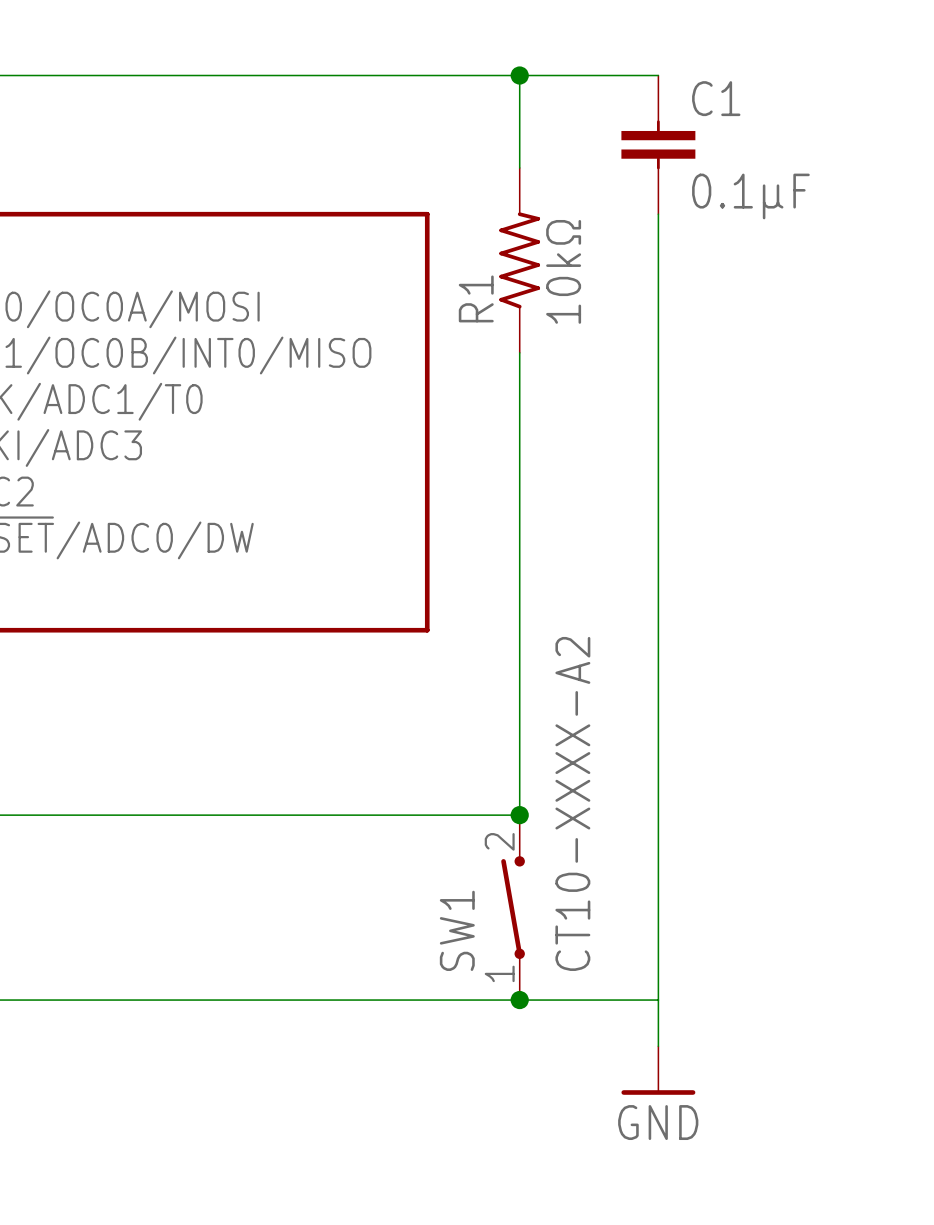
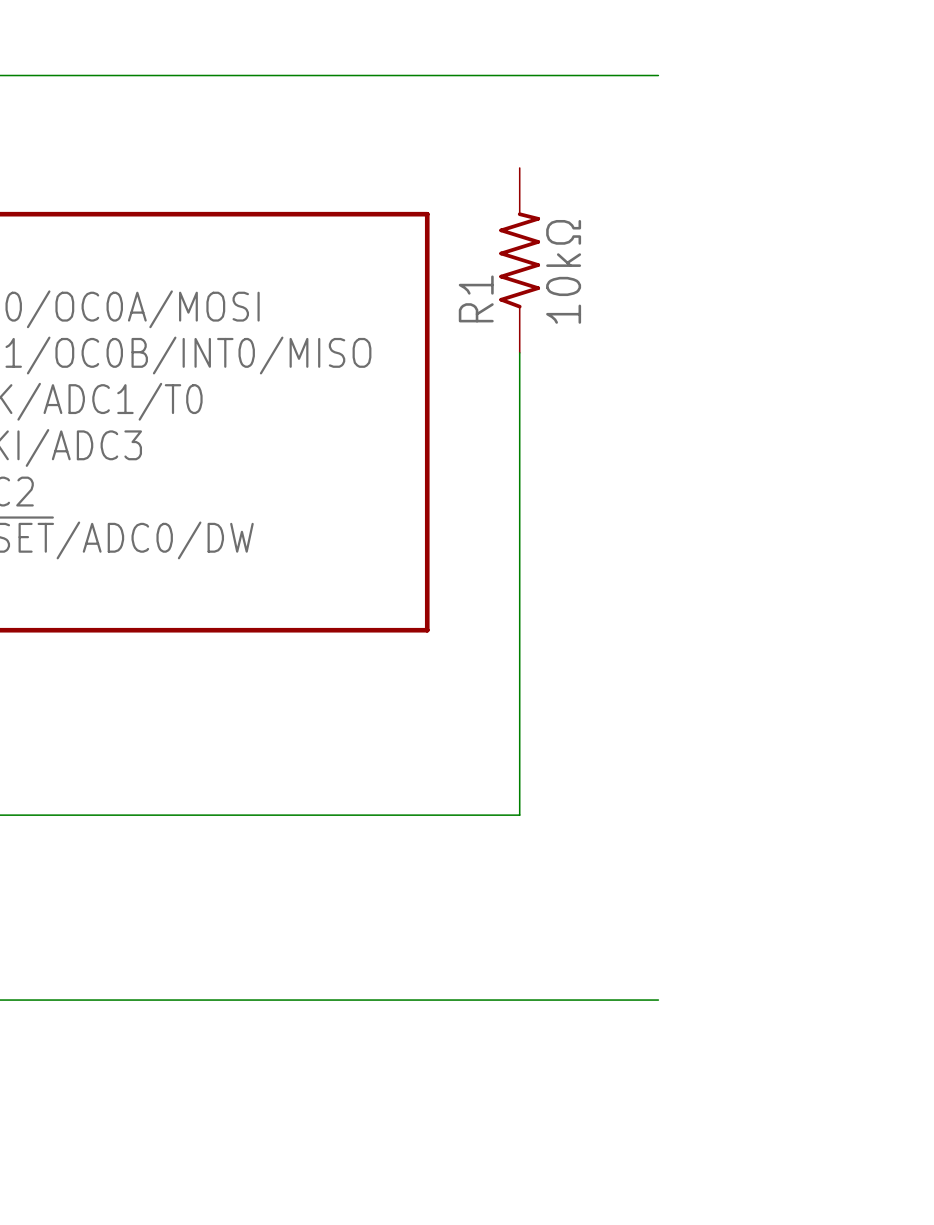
wire: (519, 75) (519, 167) -> none
junction: (519, 75) -> none
C1: 0.1μF (658, 144) -> none
wire: (658, 214) (658, 1046) -> none
junction: (519, 815) -> none
SW1: CT10-XXXX-A2 (513, 907) -> none
junction: (519, 1000) -> none
power symbol: GND (658, 1070) -> none

